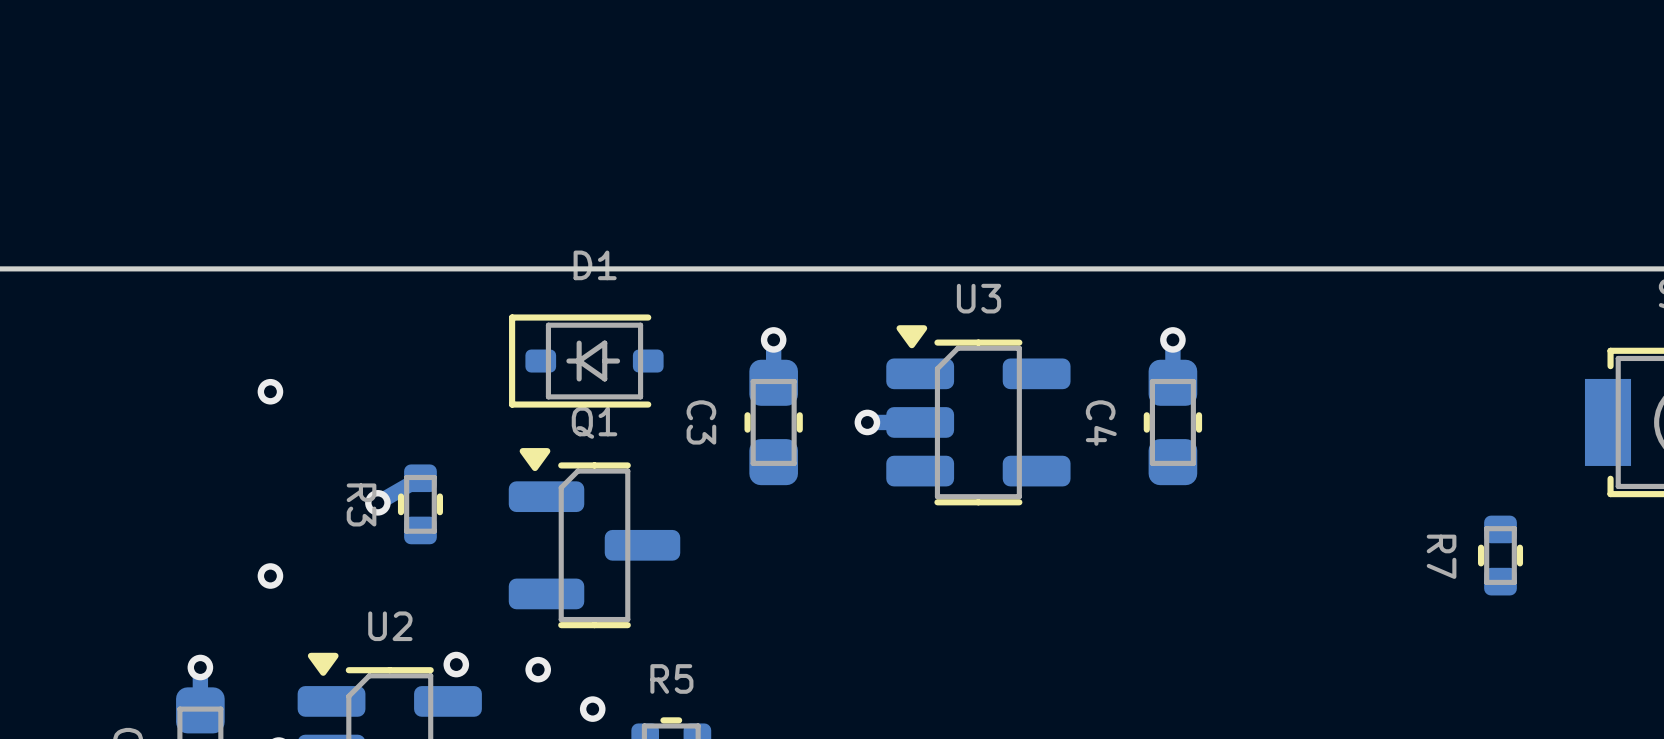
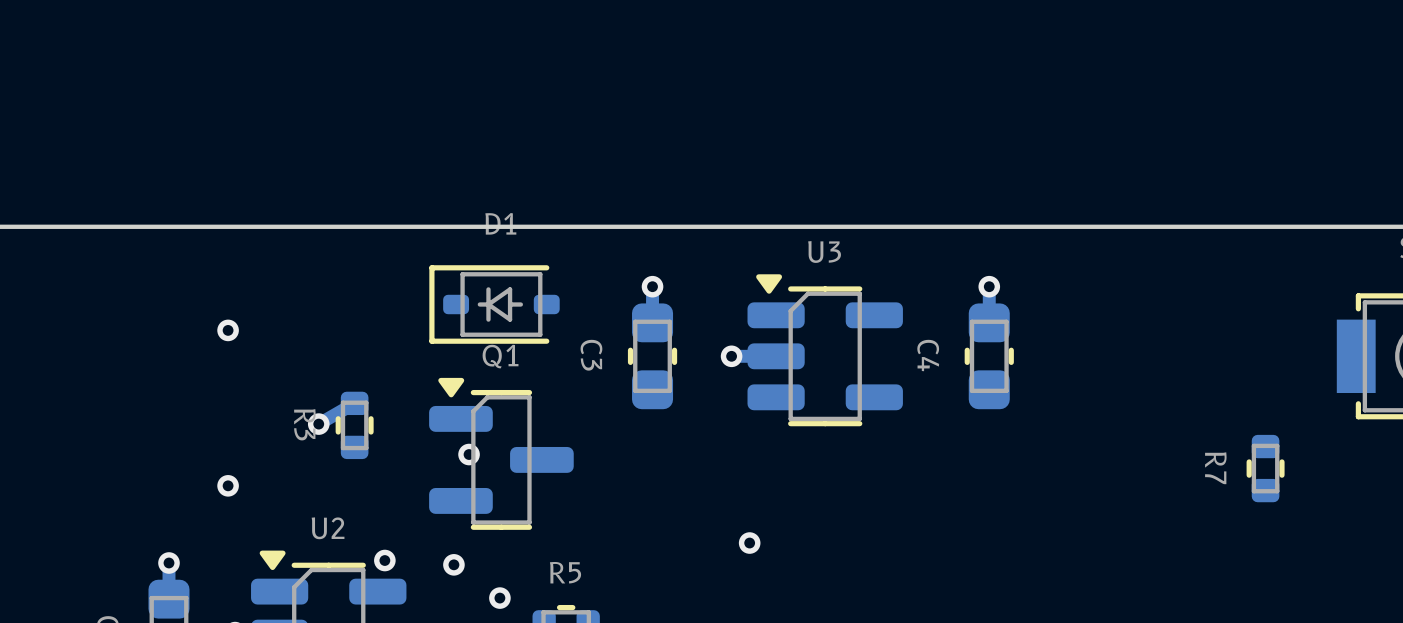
via: none -> (469, 454)
via: none -> (749, 543)

